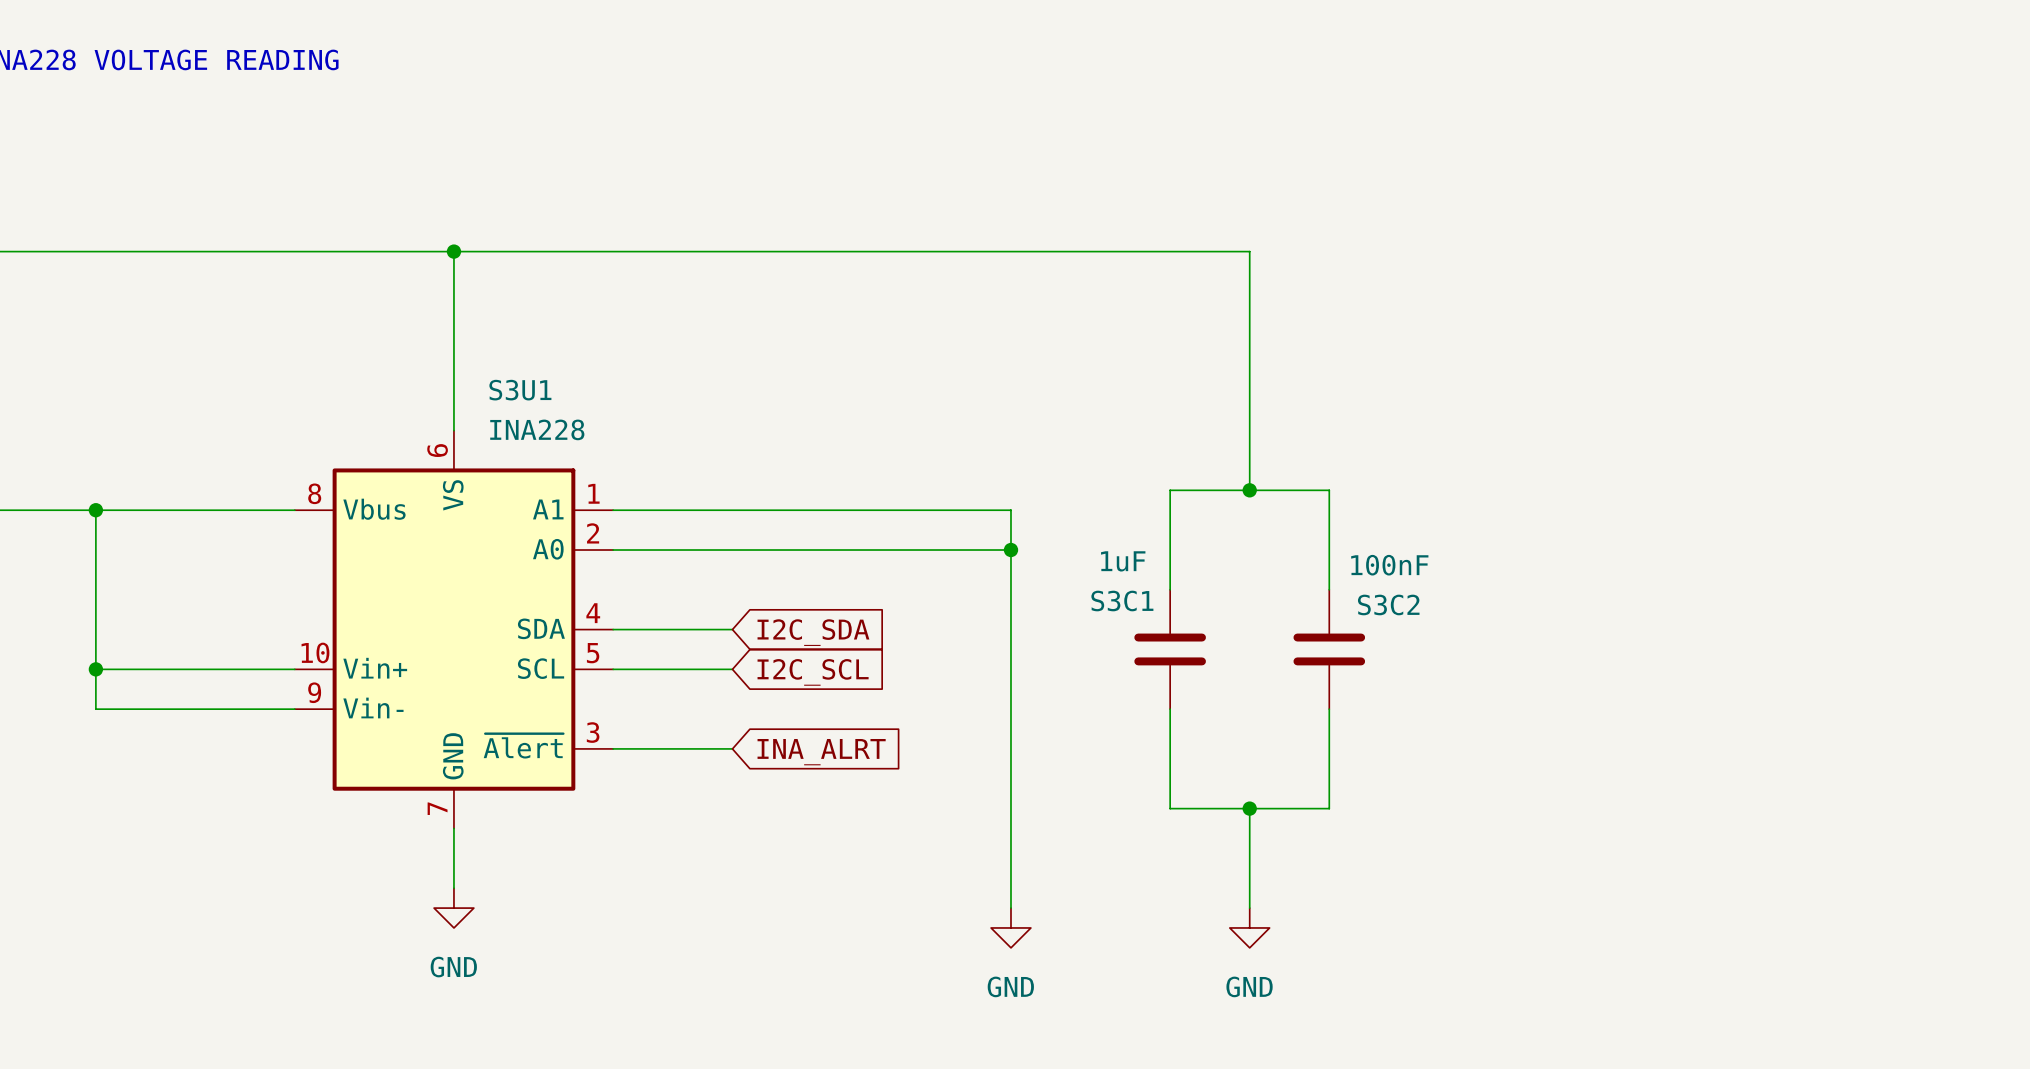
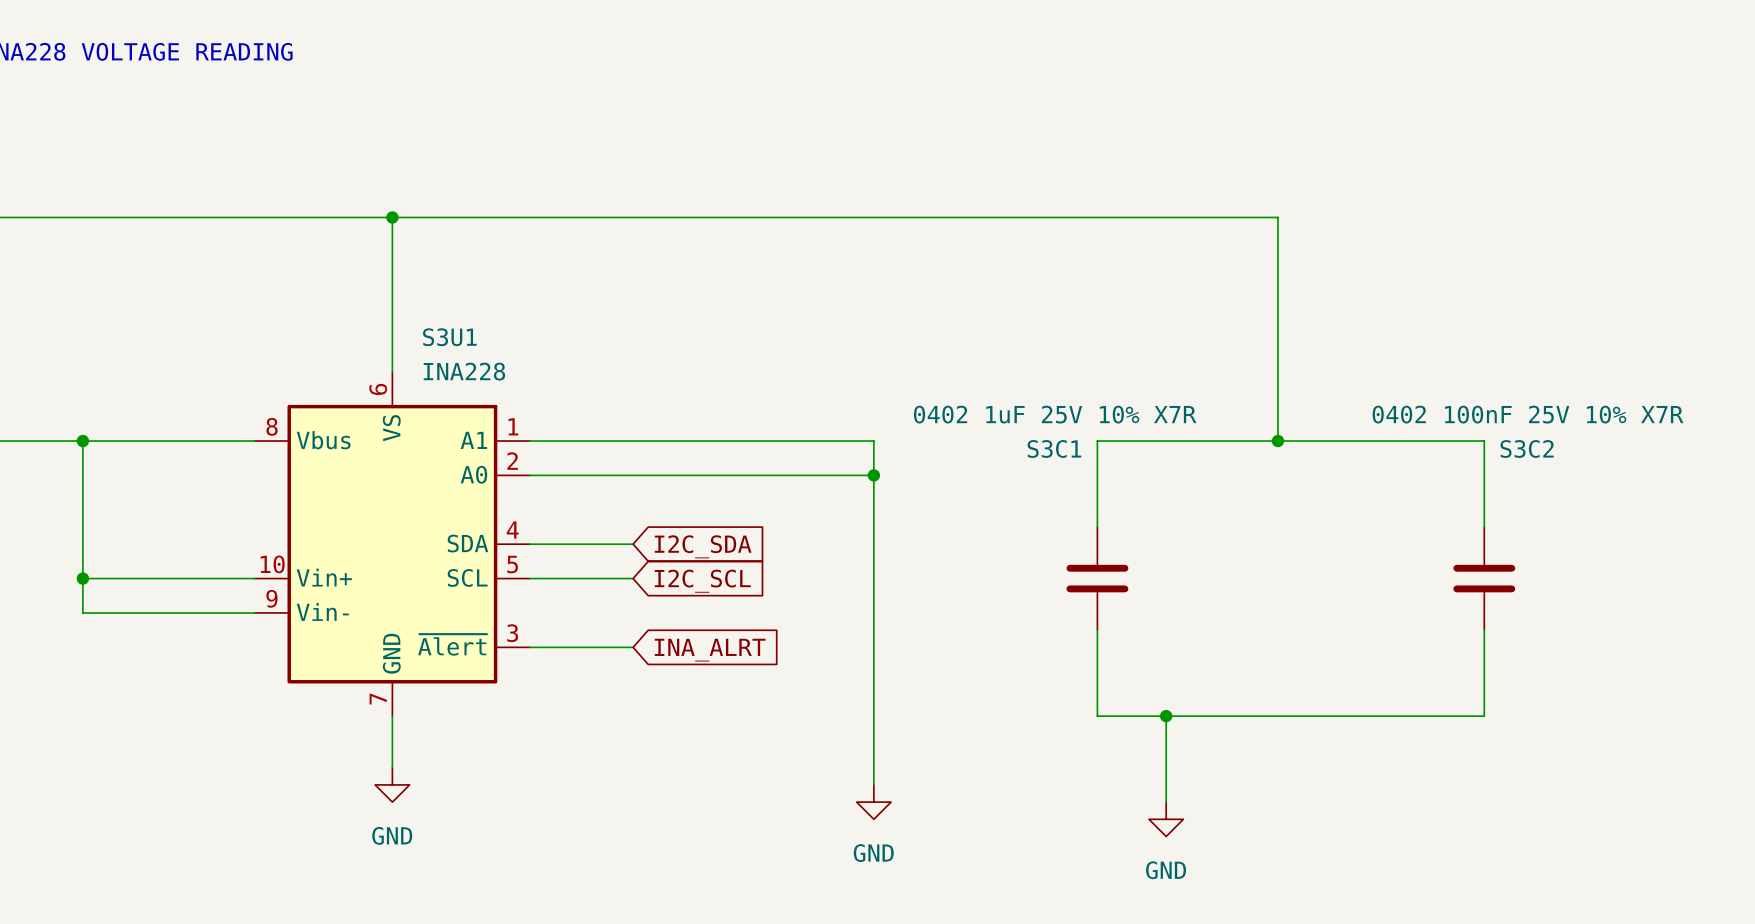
wire: (1249, 251) (1249, 490) -> (1080, 217) (1277, 217) (1277, 441)
junction: (1249, 490) -> none
junction: none -> (1277, 441)
S3C1 value: 1uF (1123, 561) -> 0402 1uF 25V 10% X7R (1055, 414)
S3C2 value: 100nF (1389, 565) -> 0402 100nF 25V 10% X7R (1528, 414)
wire: (1170, 589) (1170, 490) (1329, 490) (1329, 589) -> none
S3C1 name position: S3C1 (1122, 601) -> S3C1 (1054, 448)
S3C2 name position: S3C2 (1388, 604) -> S3C2 (1527, 448)
wire: none -> (1097, 526) (1097, 441) (1484, 441) (1484, 526)
S3C1 position: (1170, 649) -> (1097, 578)
S3C2 position: (1329, 649) -> (1484, 578)
wire: (1170, 709) (1170, 808) (1329, 808) (1329, 709) -> none
wire: none -> (1097, 630) (1097, 716) (1484, 716) (1484, 630)
wire: (1249, 808) (1249, 908) -> (1166, 716) (1166, 802)
junction: (1249, 808) -> none
junction: none -> (1166, 716)
power symbol position: GND (1249, 927) -> GND (1166, 819)

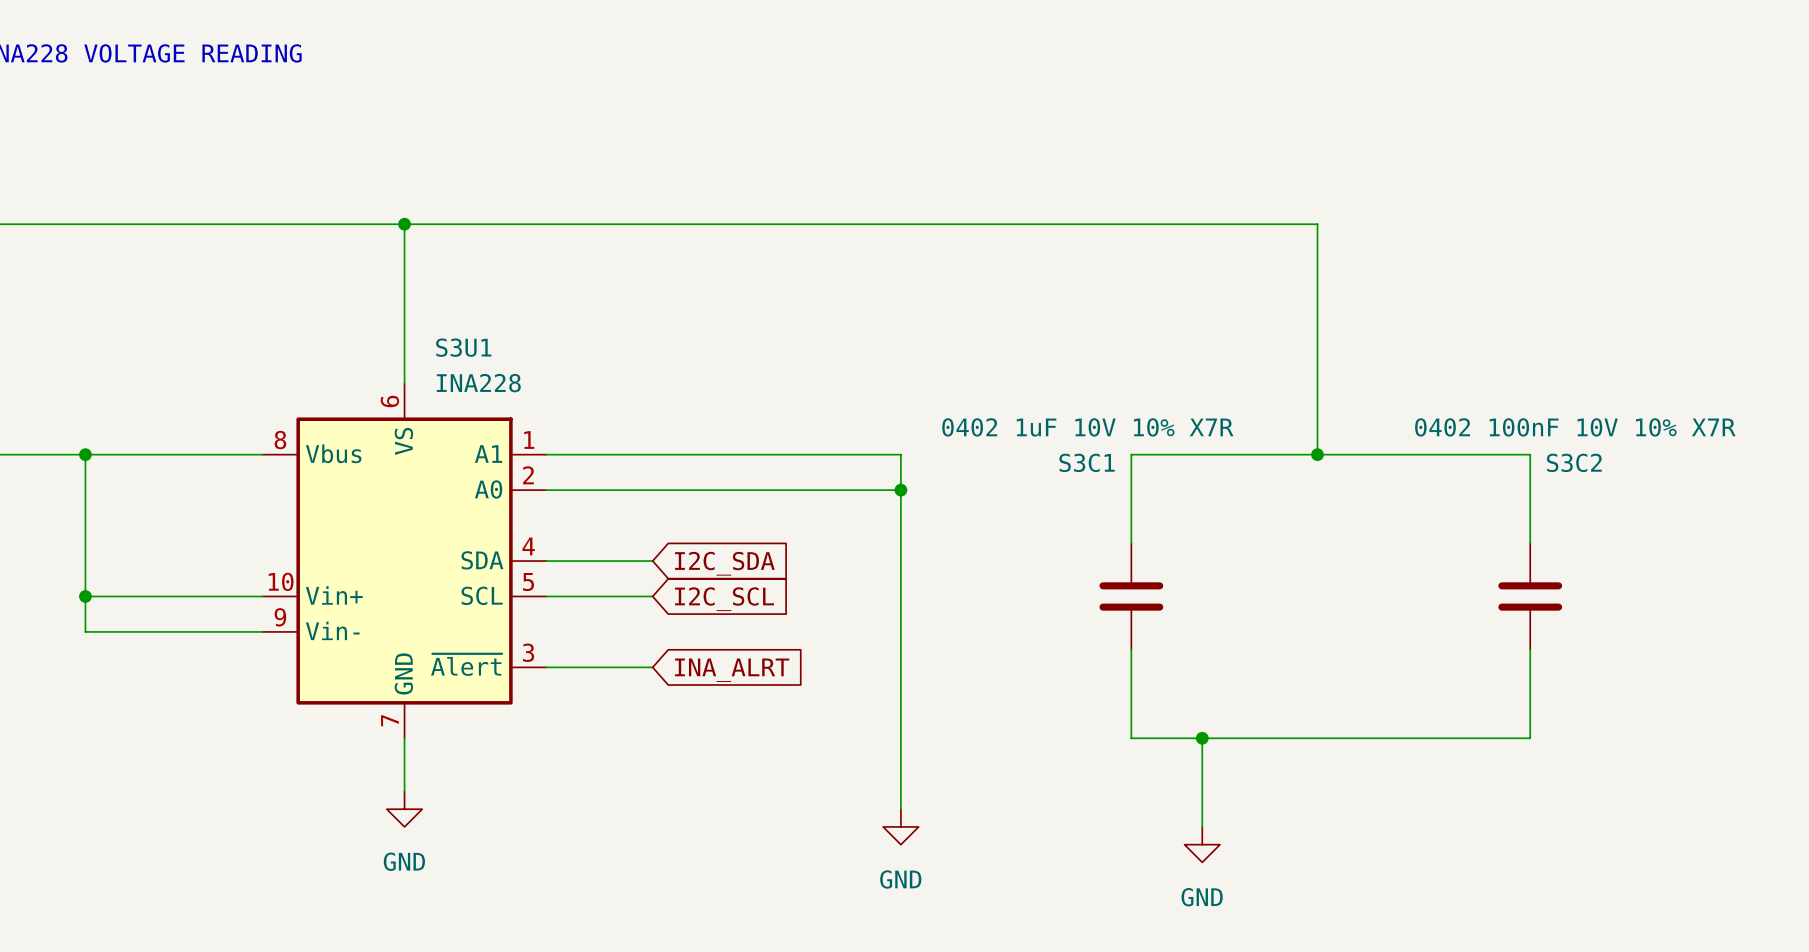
S3C1 value: 0402 1uF 25V 10% X7R (1055, 414) -> 0402 1uF 10V 10% X7R (1087, 427)
S3C2 value: 0402 100nF 25V 10% X7R (1528, 414) -> 0402 100nF 10V 10% X7R (1575, 427)

